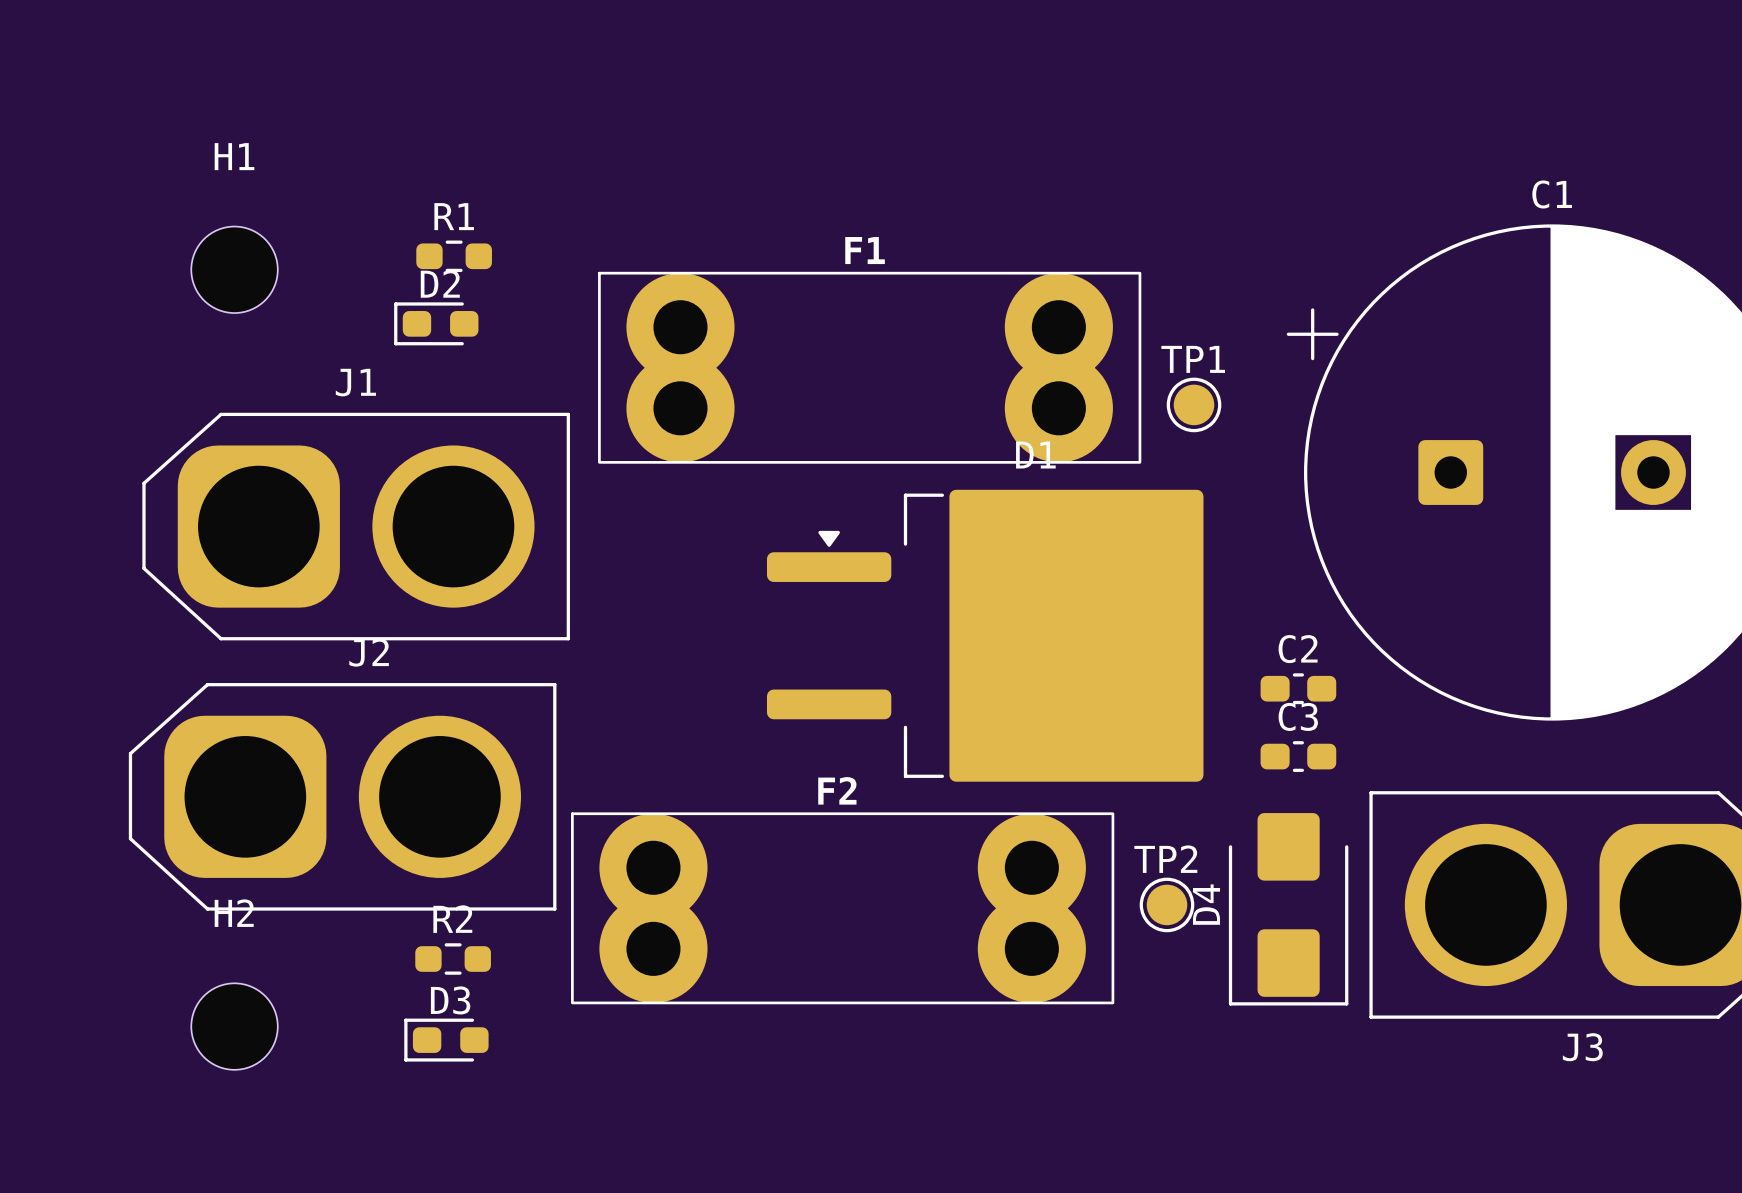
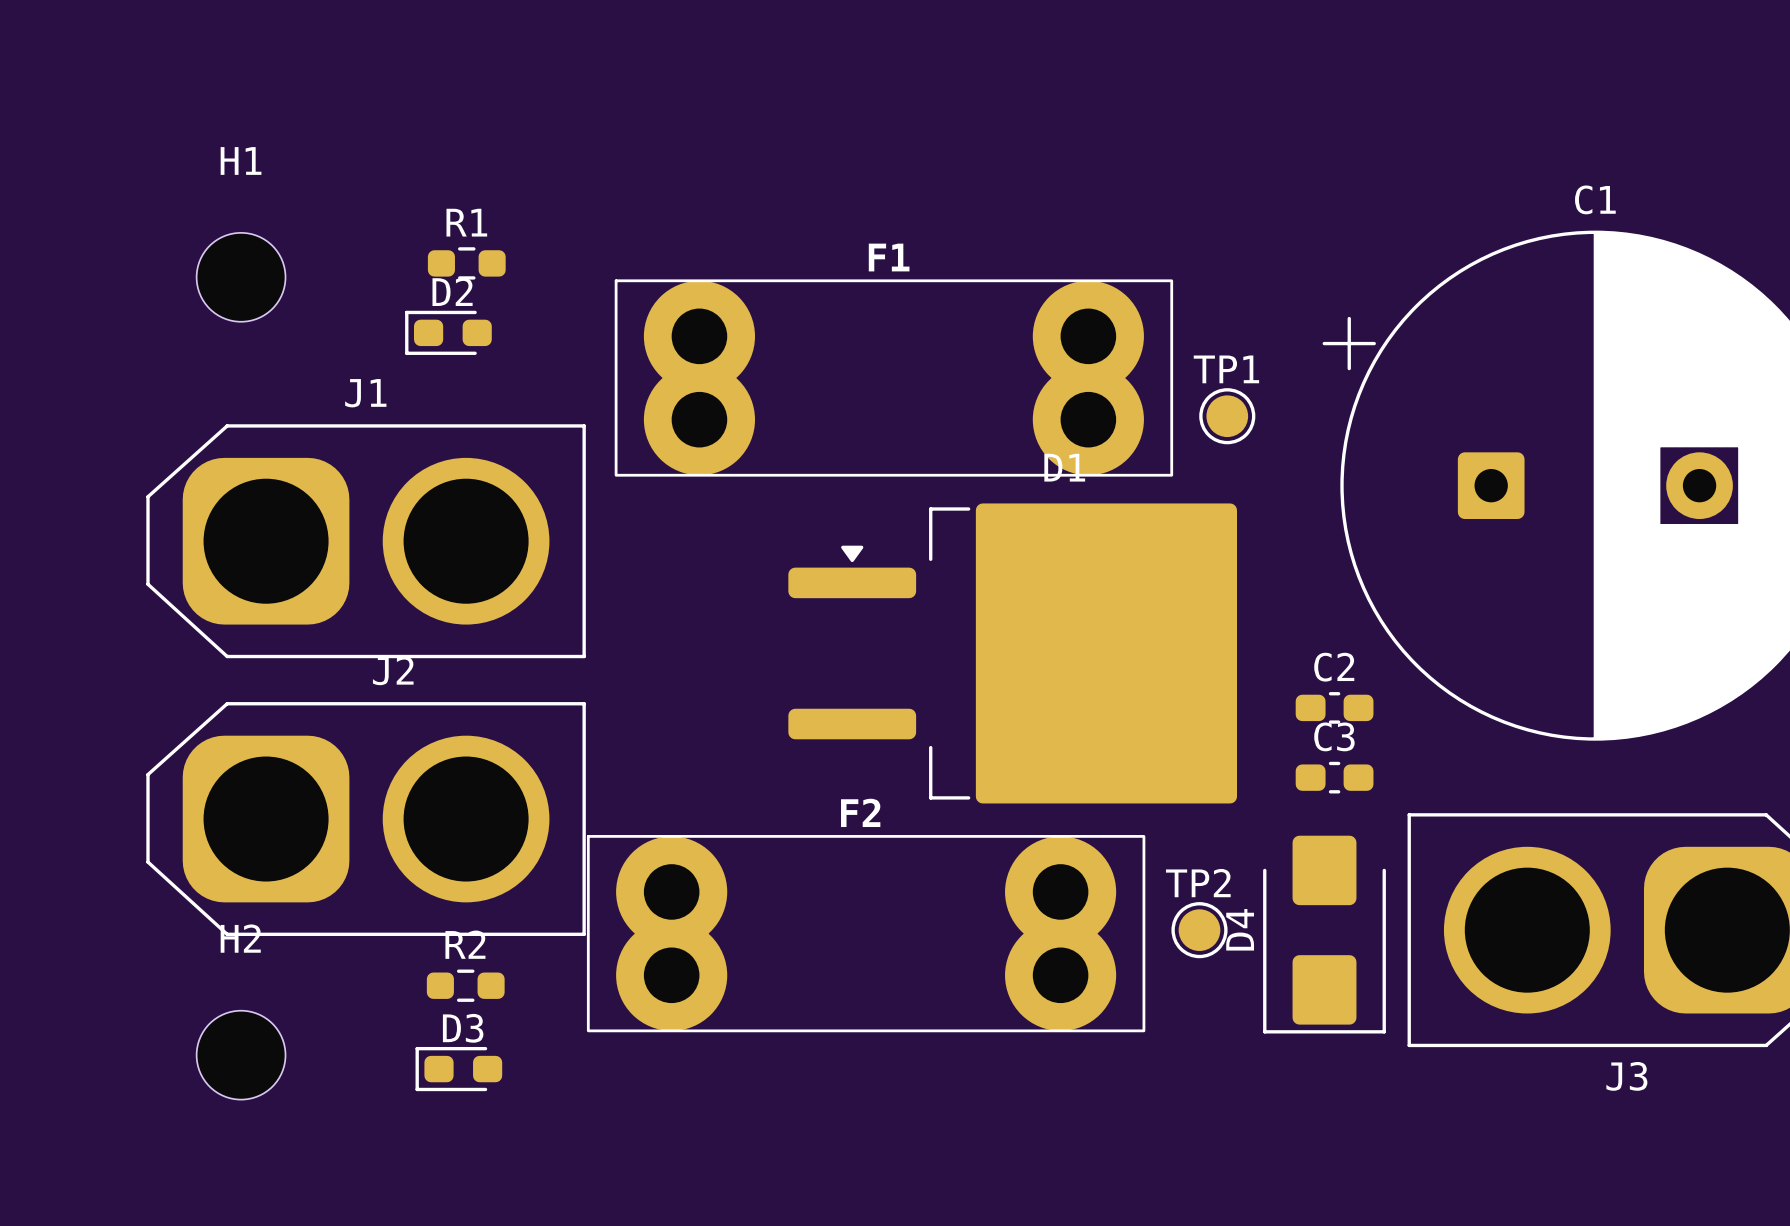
J2 position: (342, 796) -> (366, 819)

